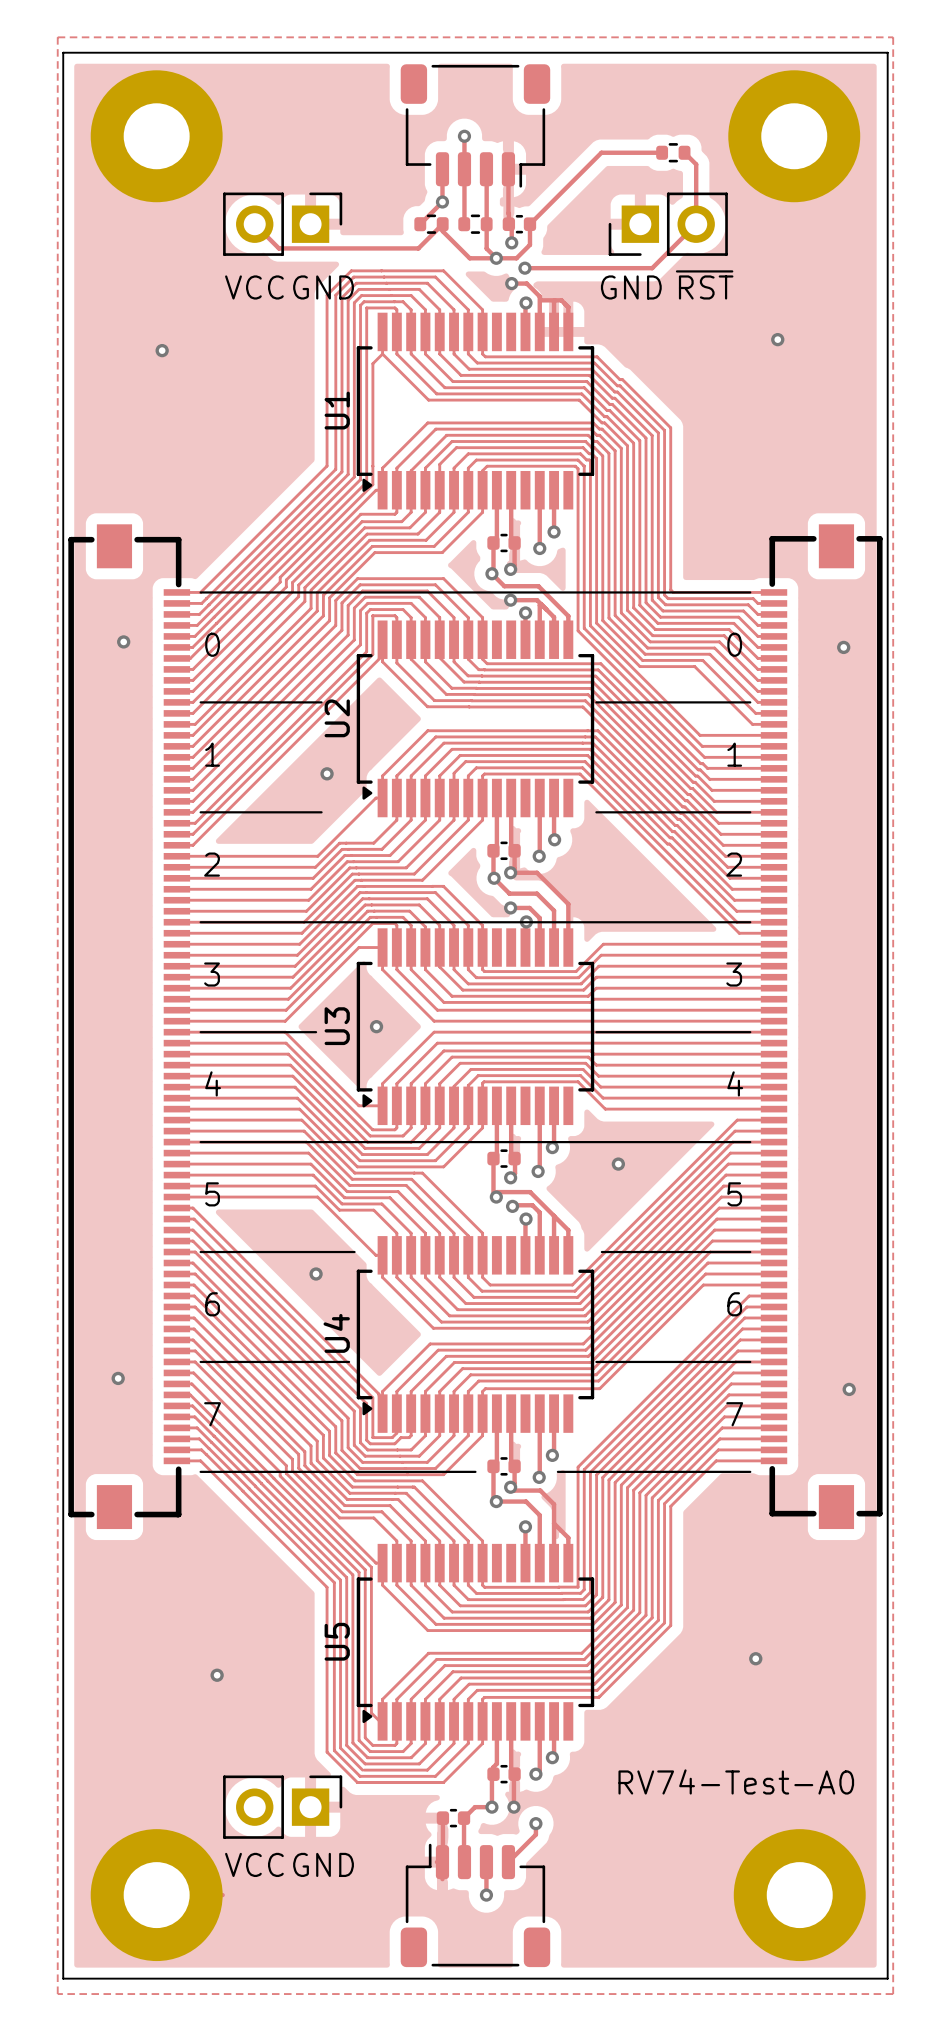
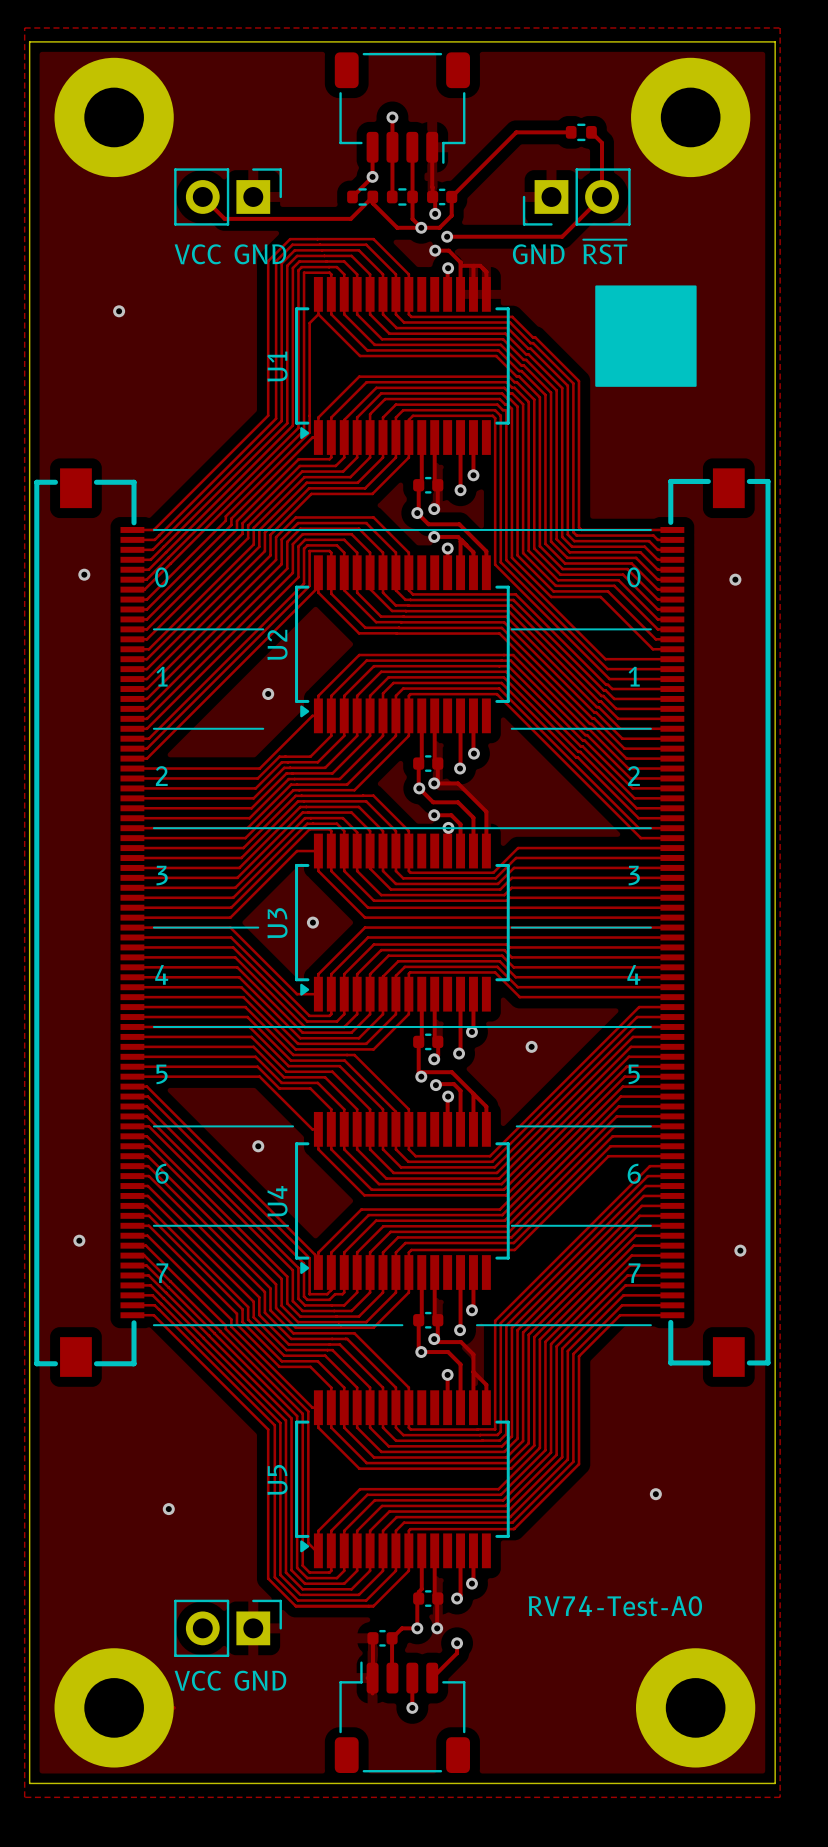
drawing: none -> [595, 285, 697, 387]

